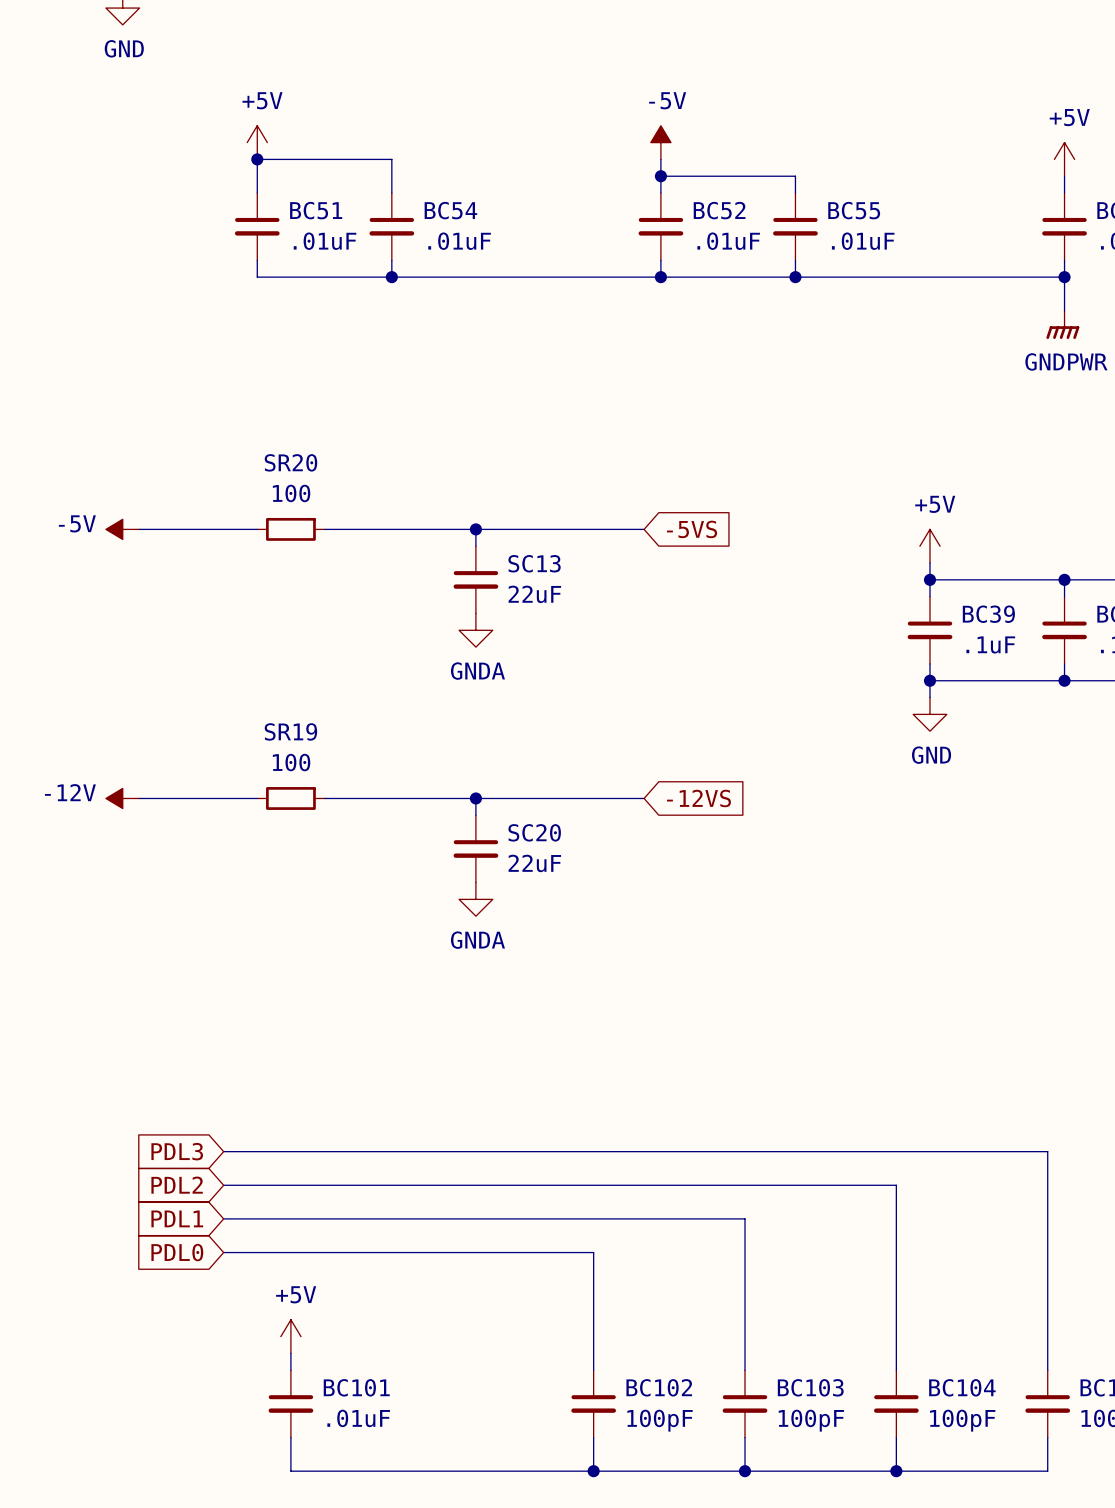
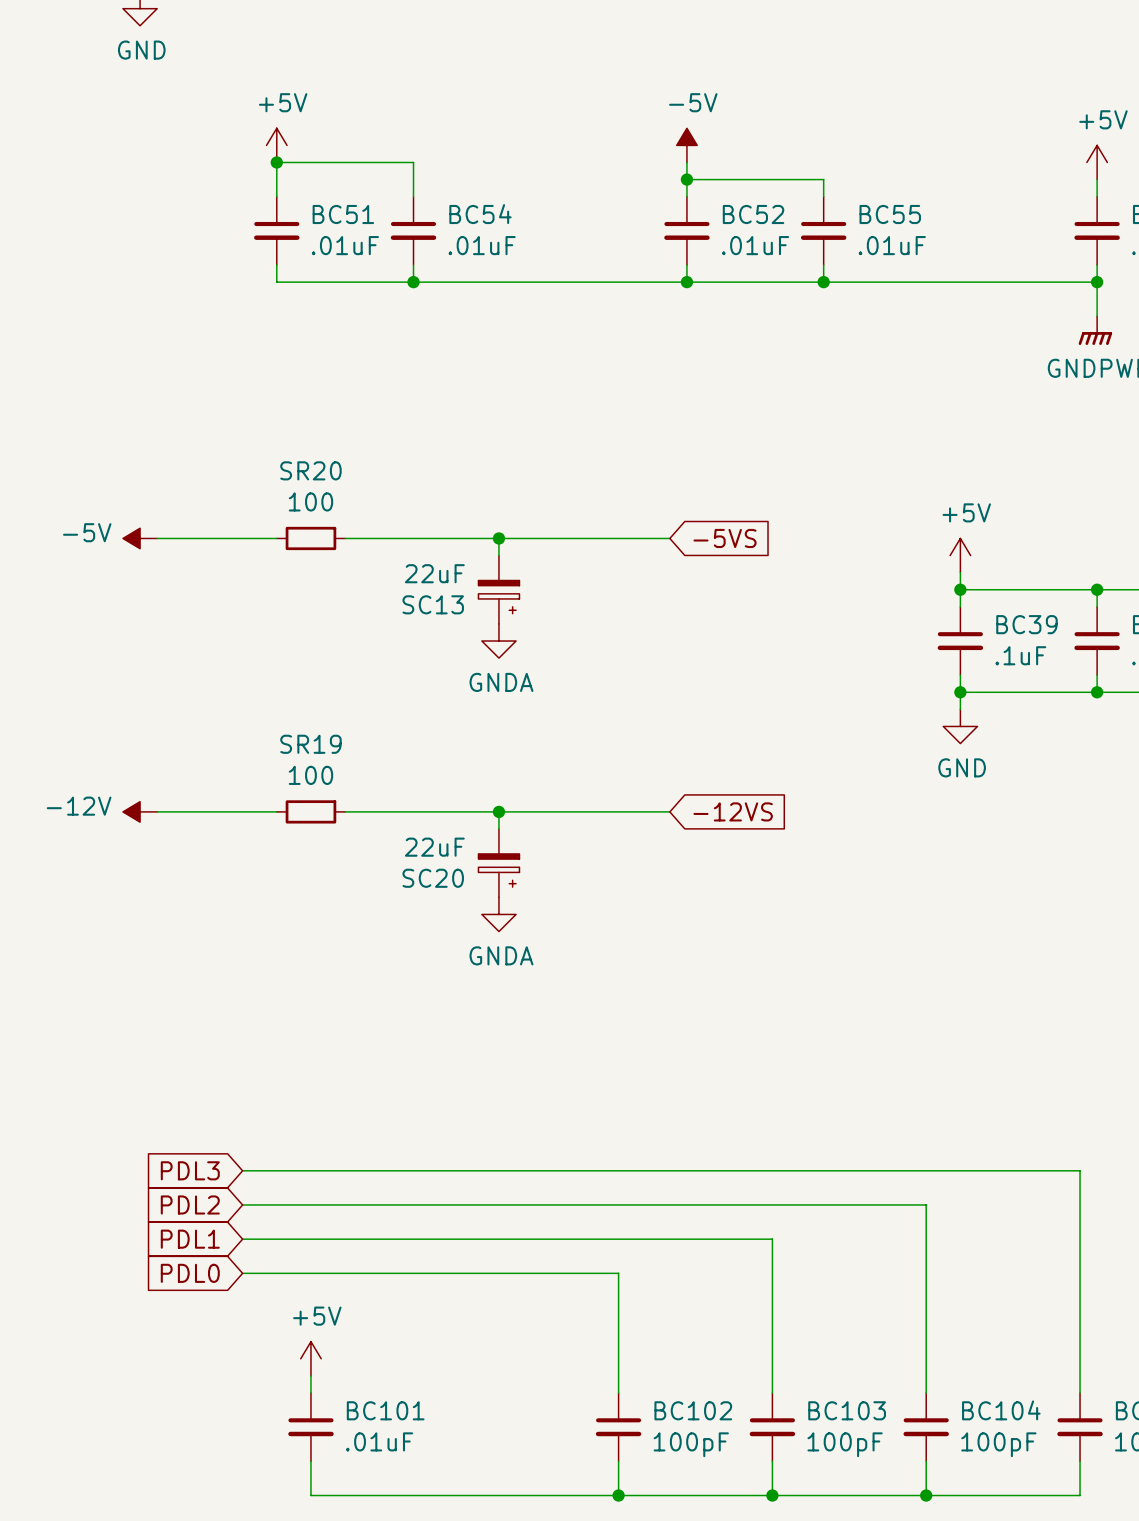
SC13 symbol: [453, 546, 499, 614] -> [478, 555, 520, 624]
SC13 name position: SC13 (534, 563) -> SC13 (433, 604)
SC13 value position: 22uF (534, 594) -> 22uF (434, 573)
SC20 symbol: [453, 815, 499, 883] -> [478, 829, 520, 898]
SC20 name position: SC20 (534, 832) -> SC20 (433, 878)
SC20 value position: 22uF (534, 863) -> 22uF (434, 847)

